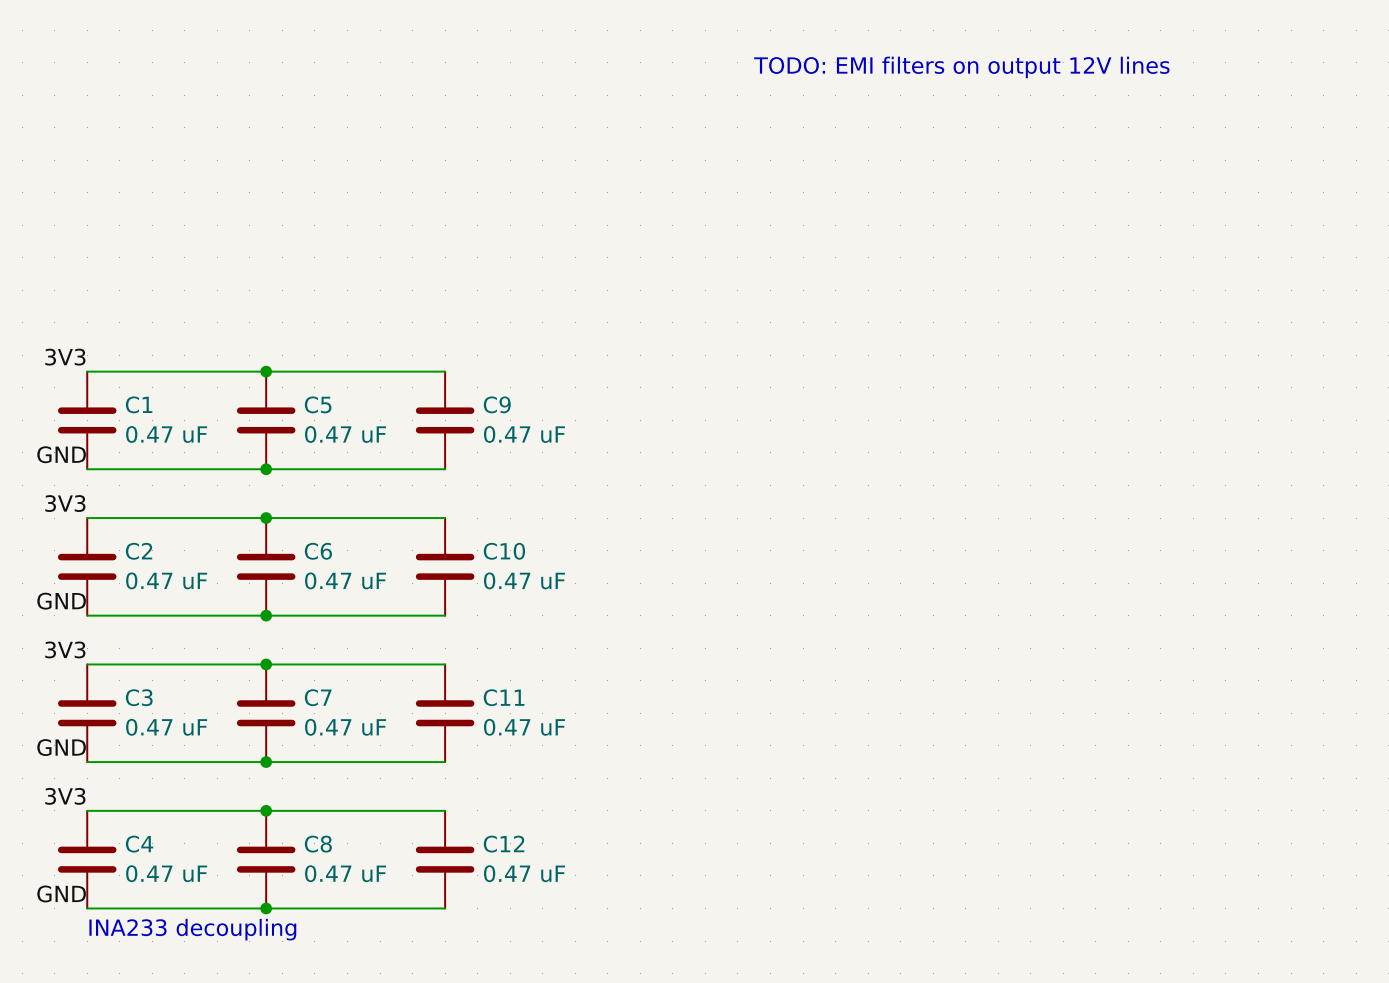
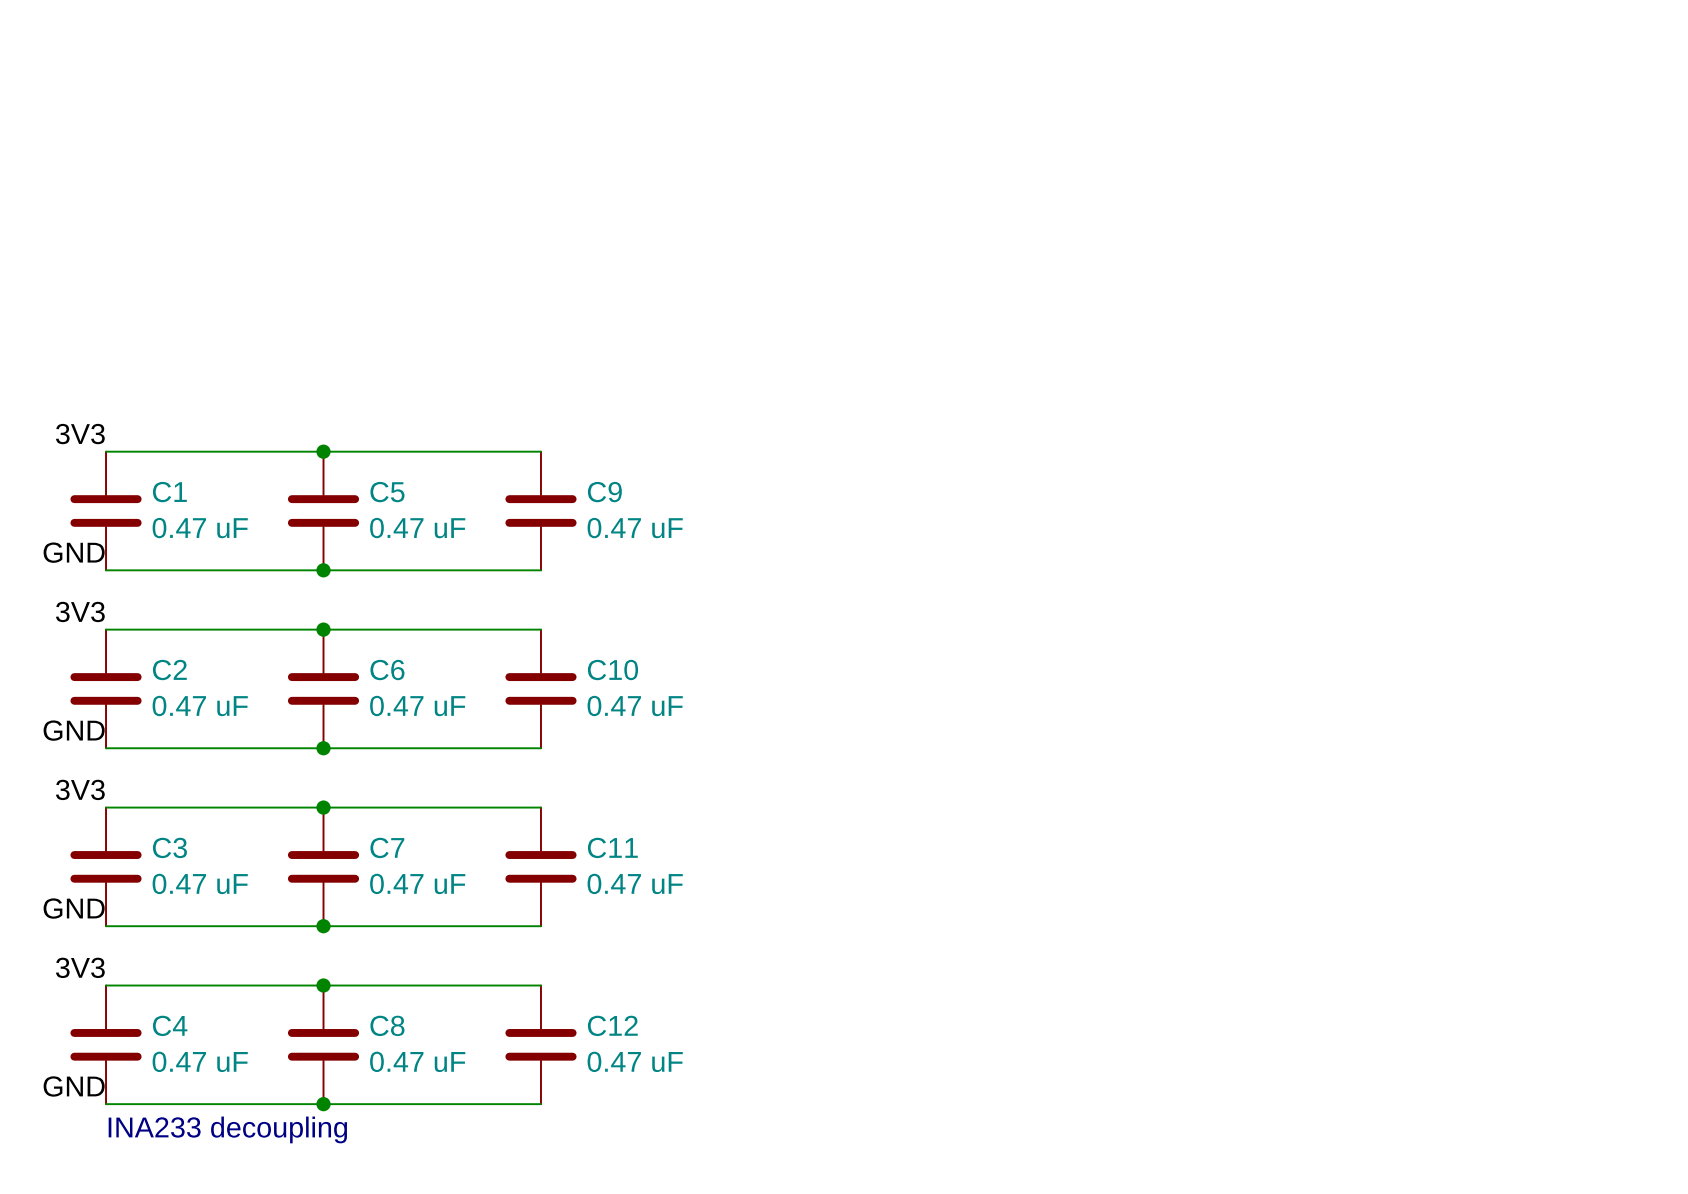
text: TODO: EMI filters on output 12V lines (961, 67) -> none

